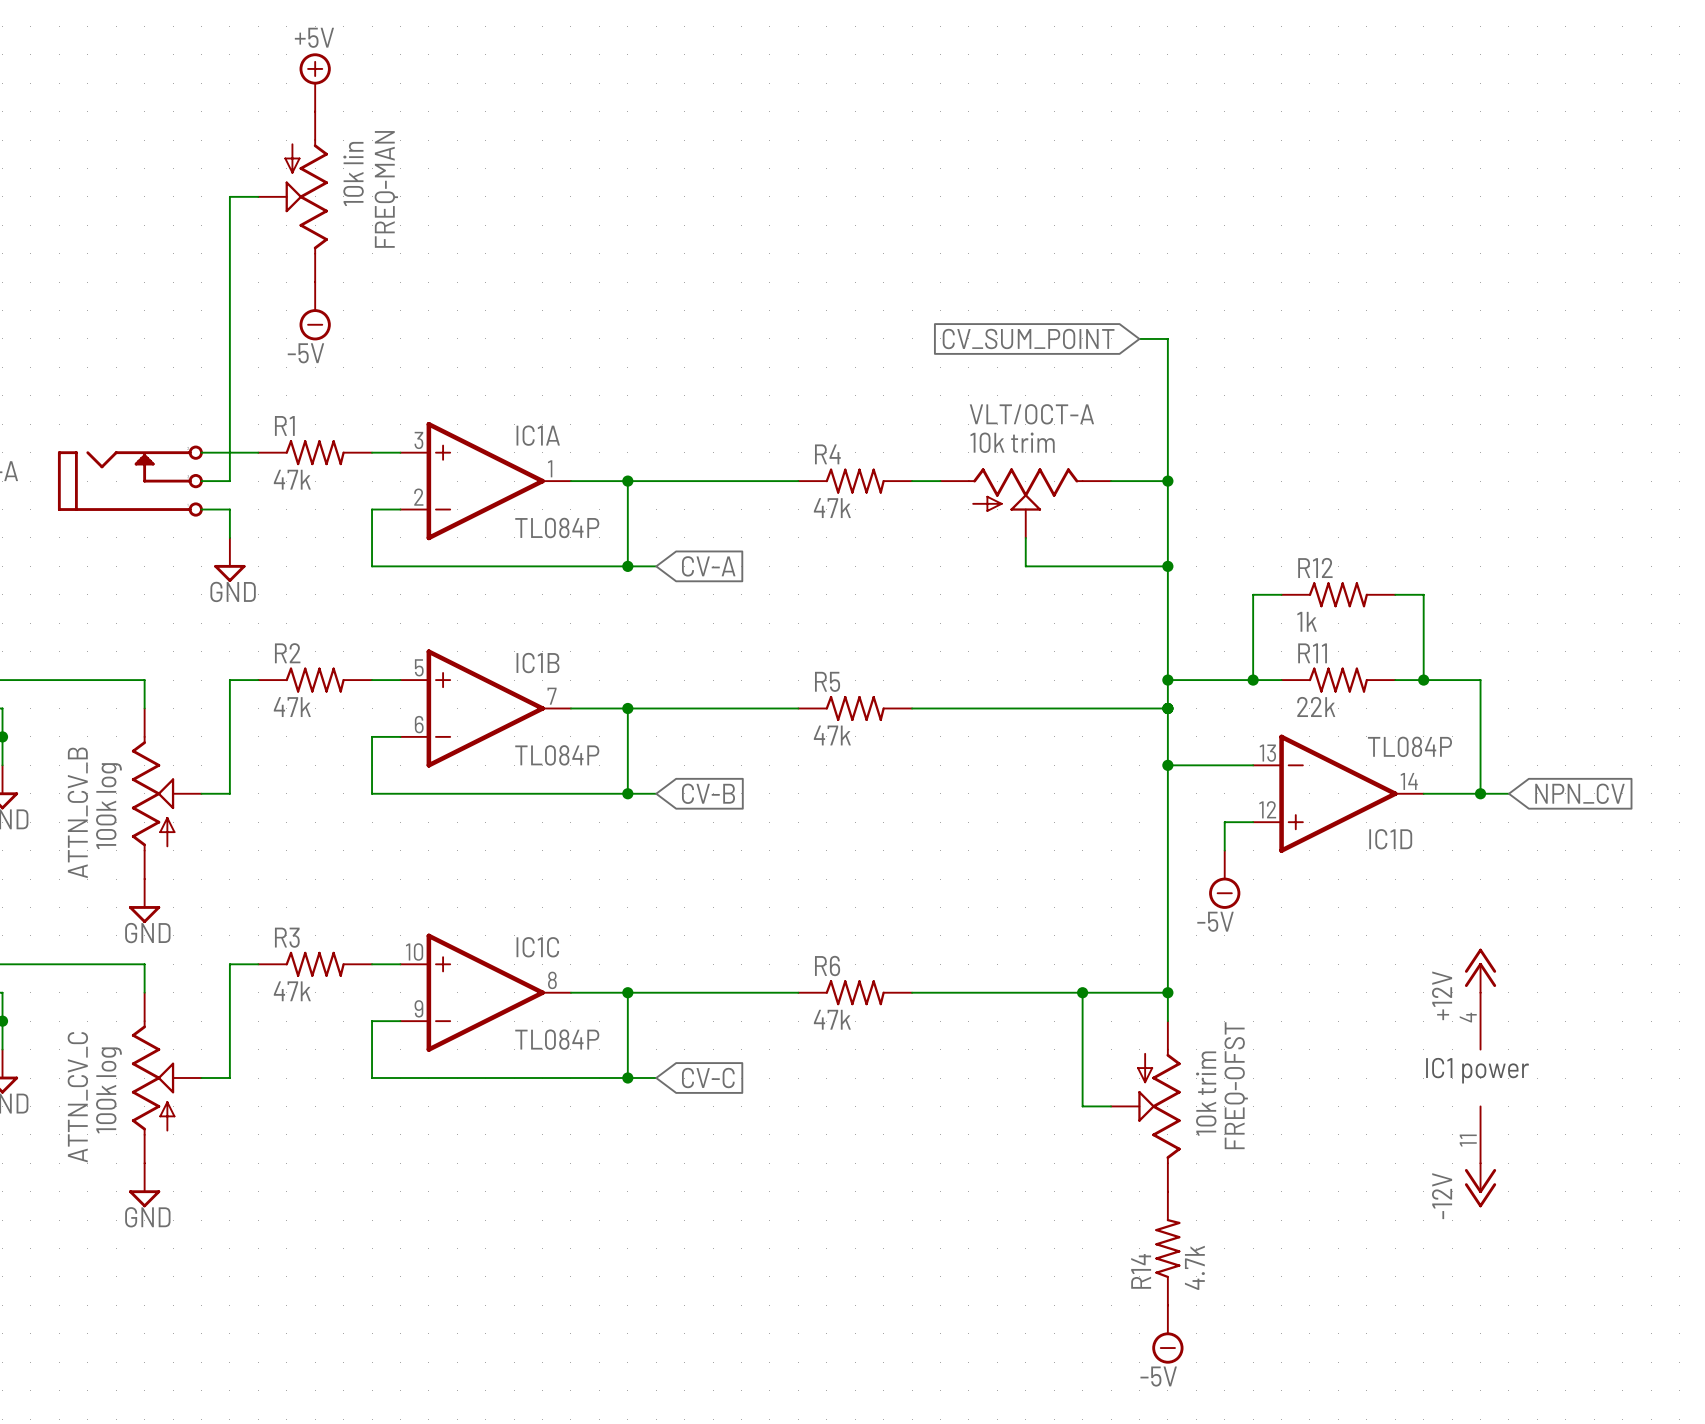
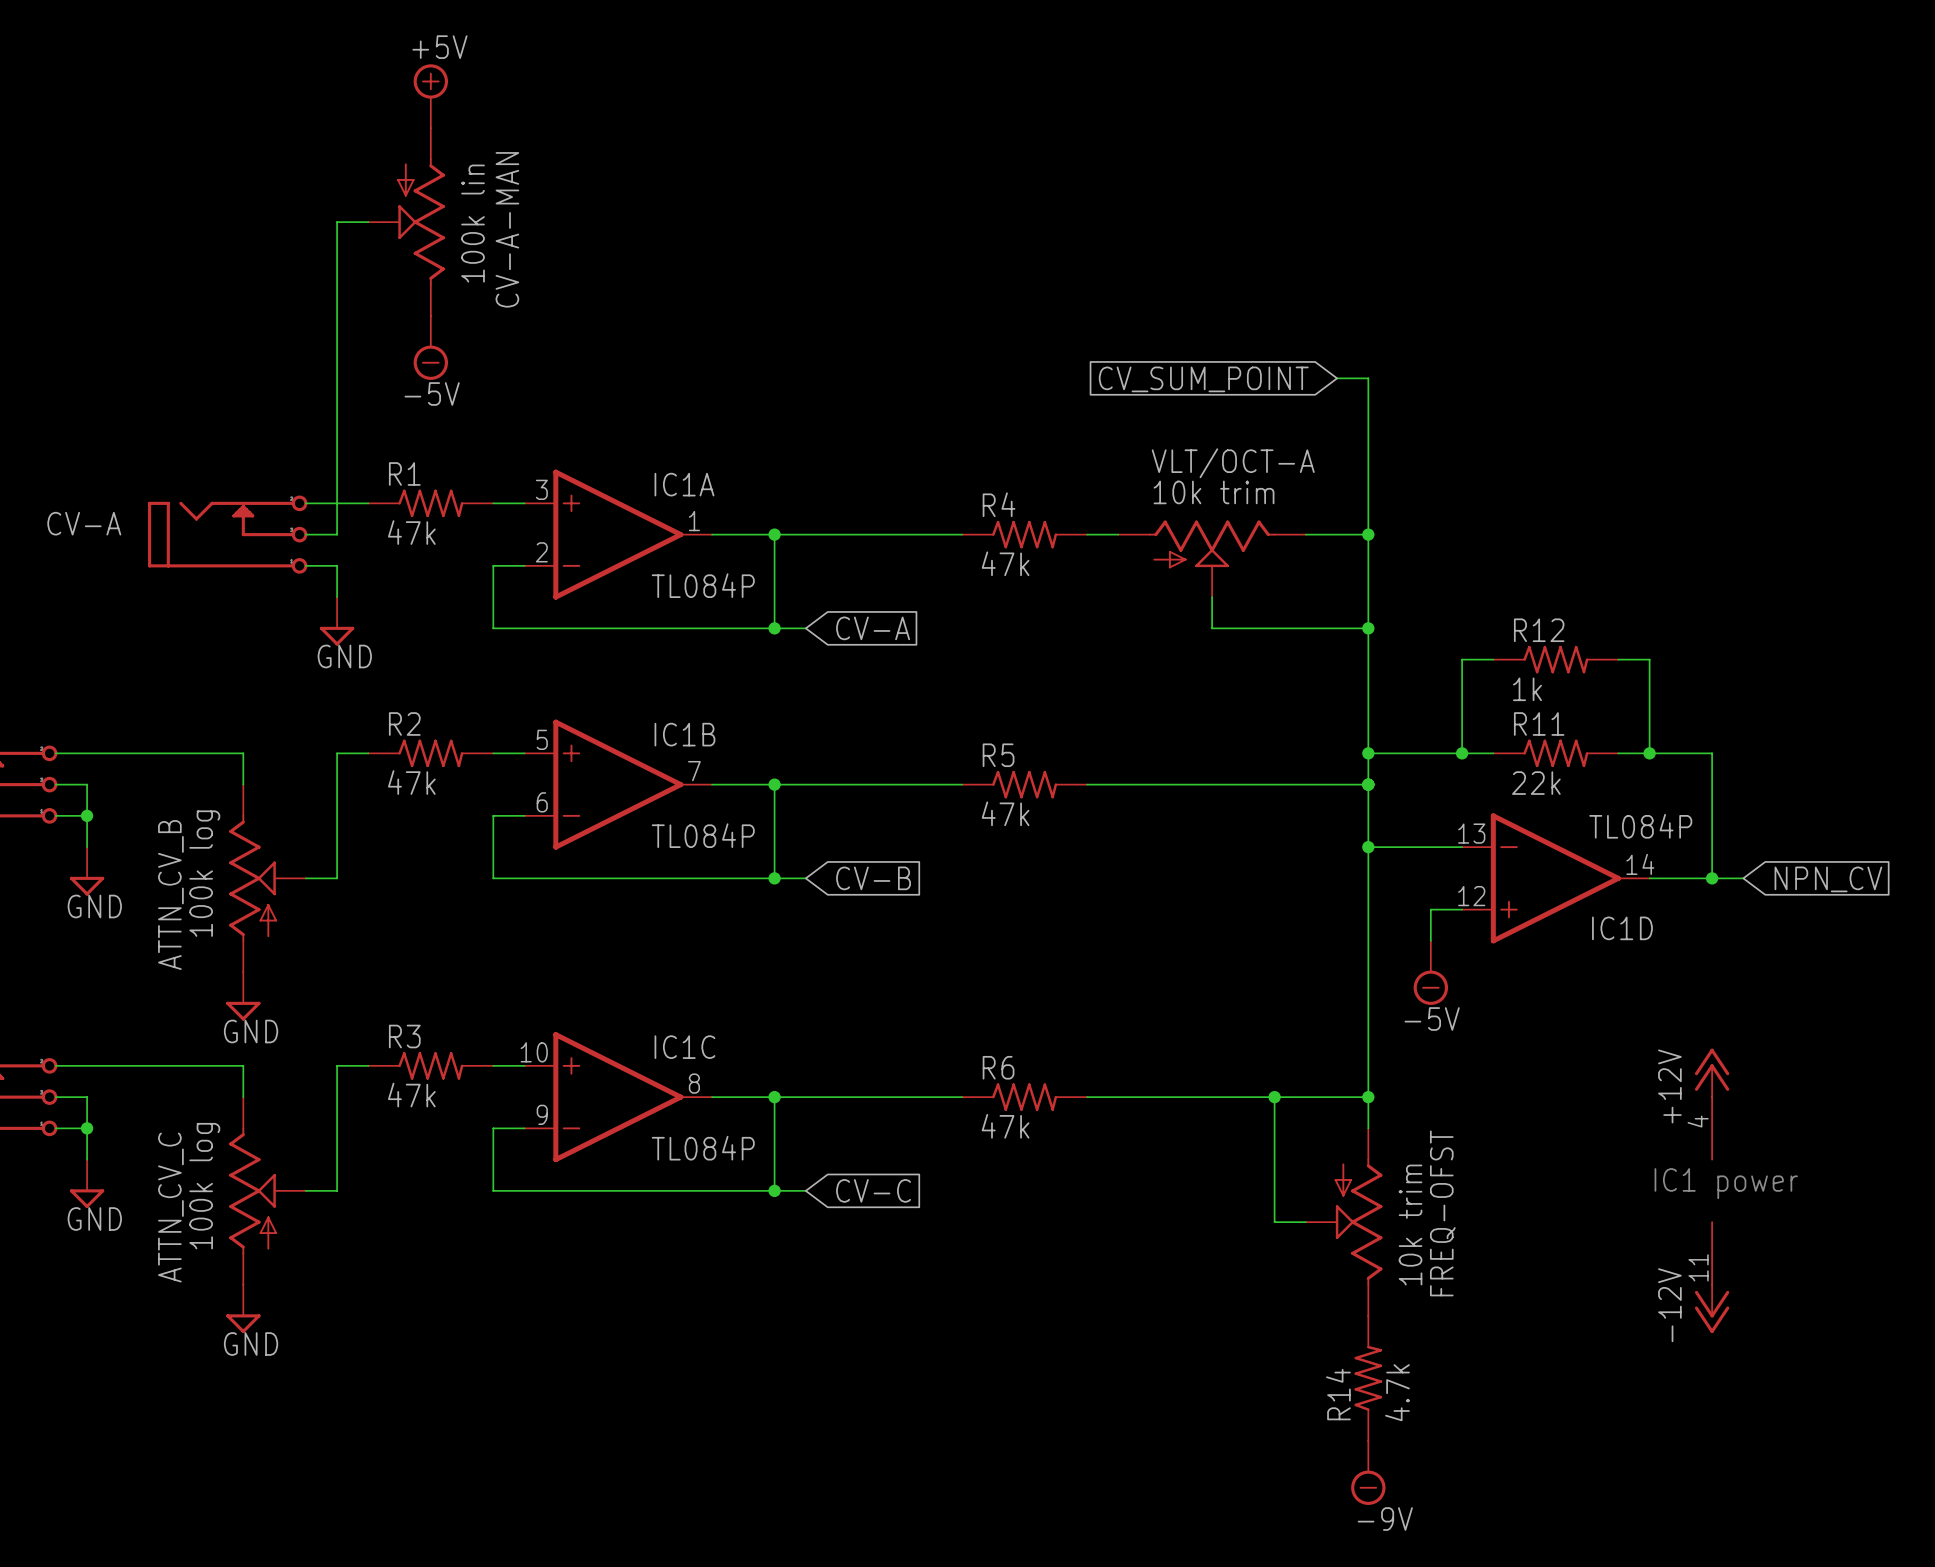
FREQ-MAN value: 10k lin (353, 173) -> 100k lin (473, 223)
FREQ-MAN name: FREQ-MAN (386, 189) -> CV-A-MAN (507, 229)
power symbol: -5V (1167, 1334) -> -9V (1368, 1472)

